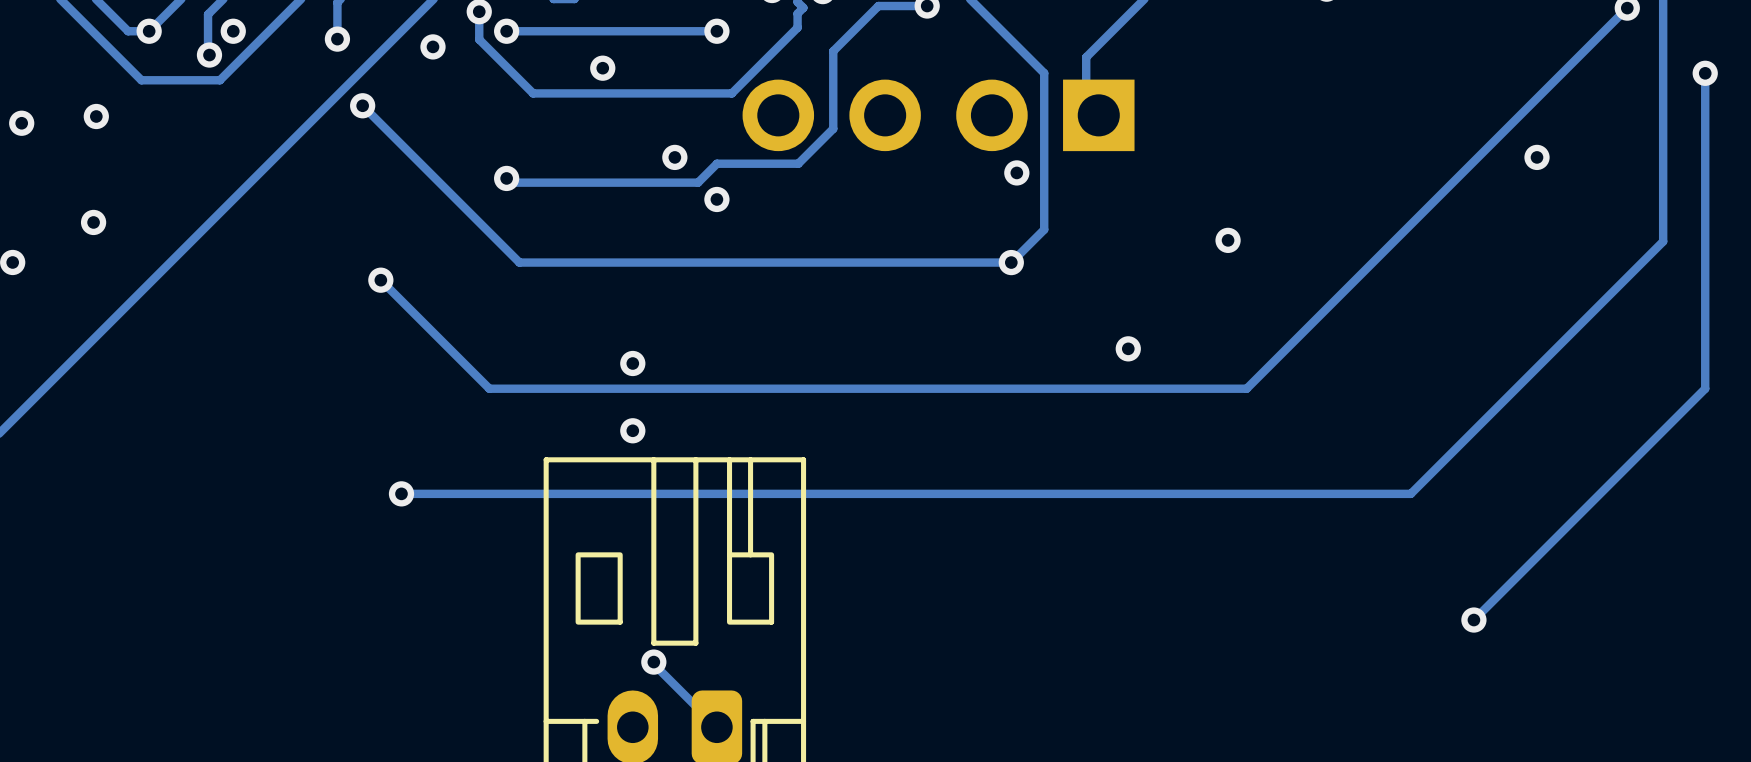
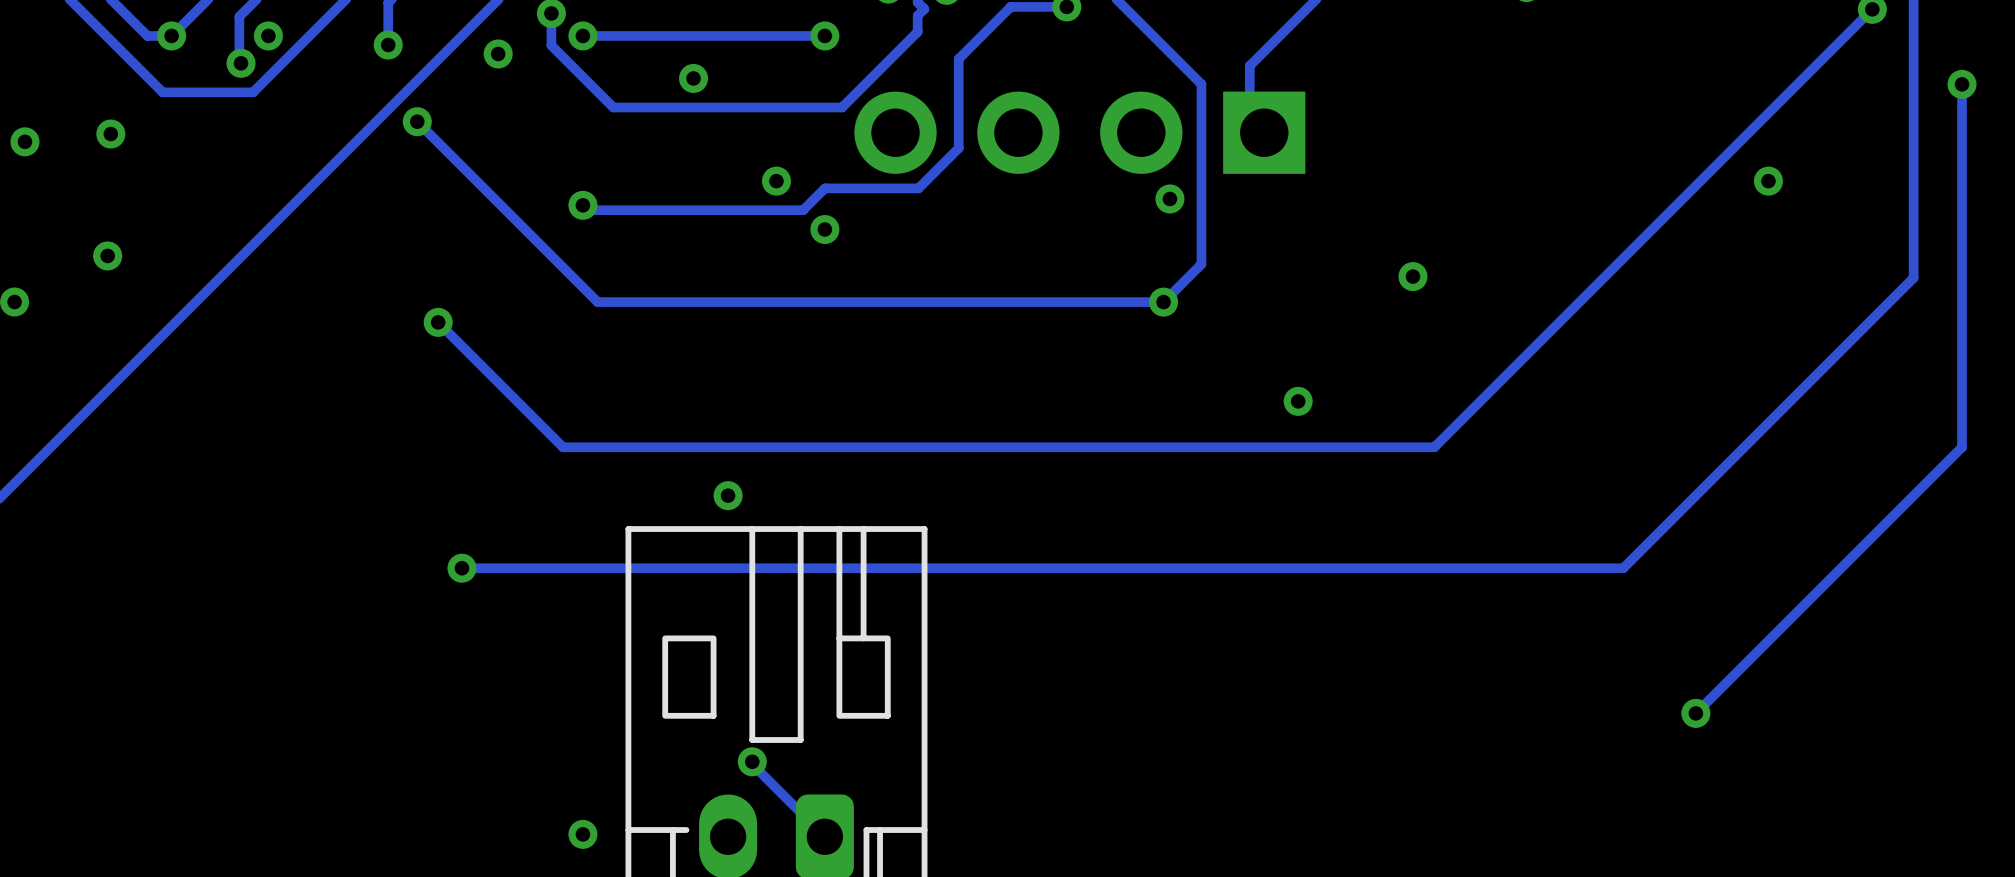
via: (632, 363) -> none
via: none -> (582, 834)

